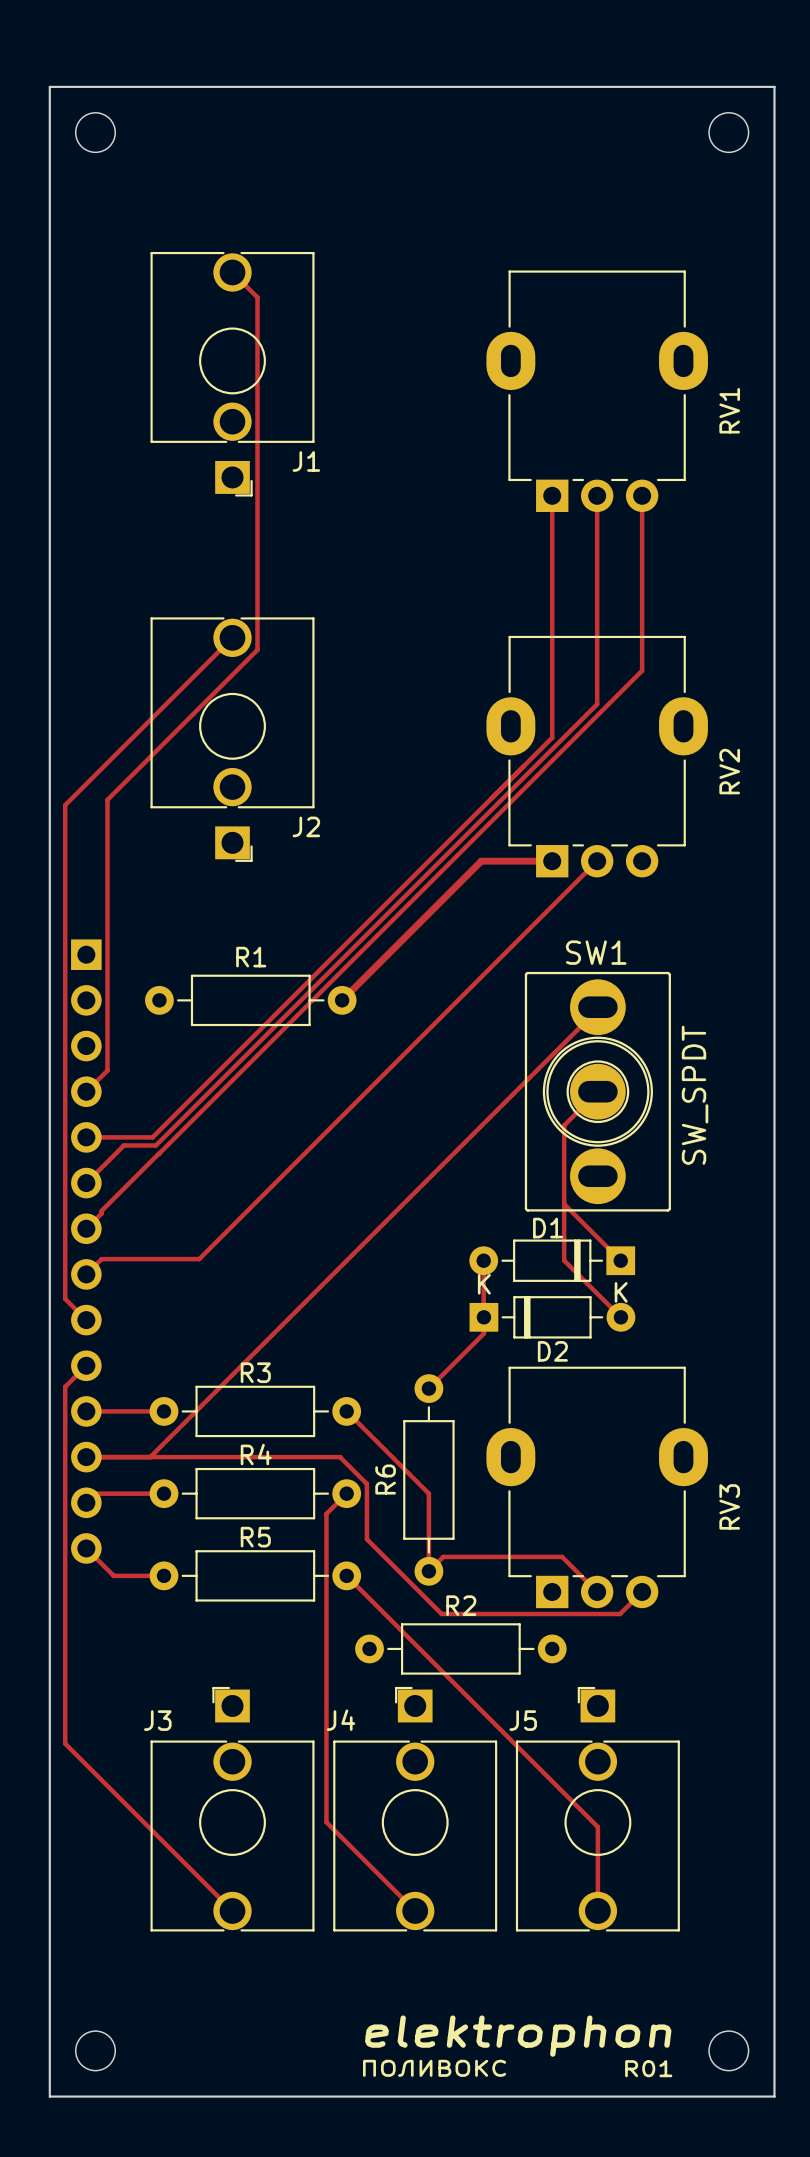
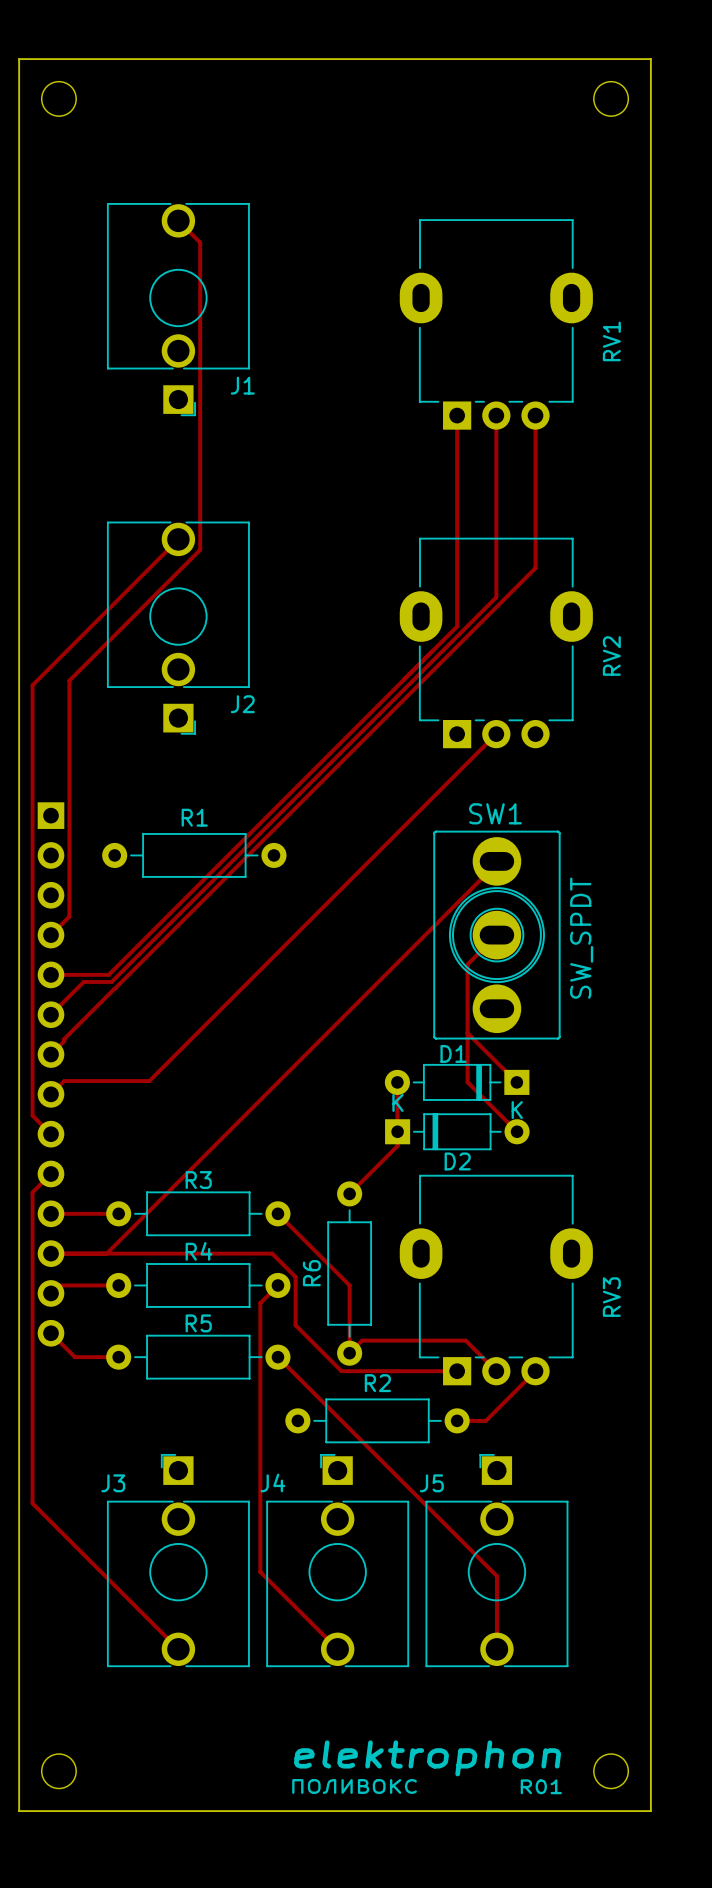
track: (552, 861) (481, 861) (342, 1000) -> none
track: (419, 1591) (441, 1614) (620, 1614) -> (341, 1371) (457, 1371)
track: none -> (516, 1390) (485, 1420) (457, 1420)

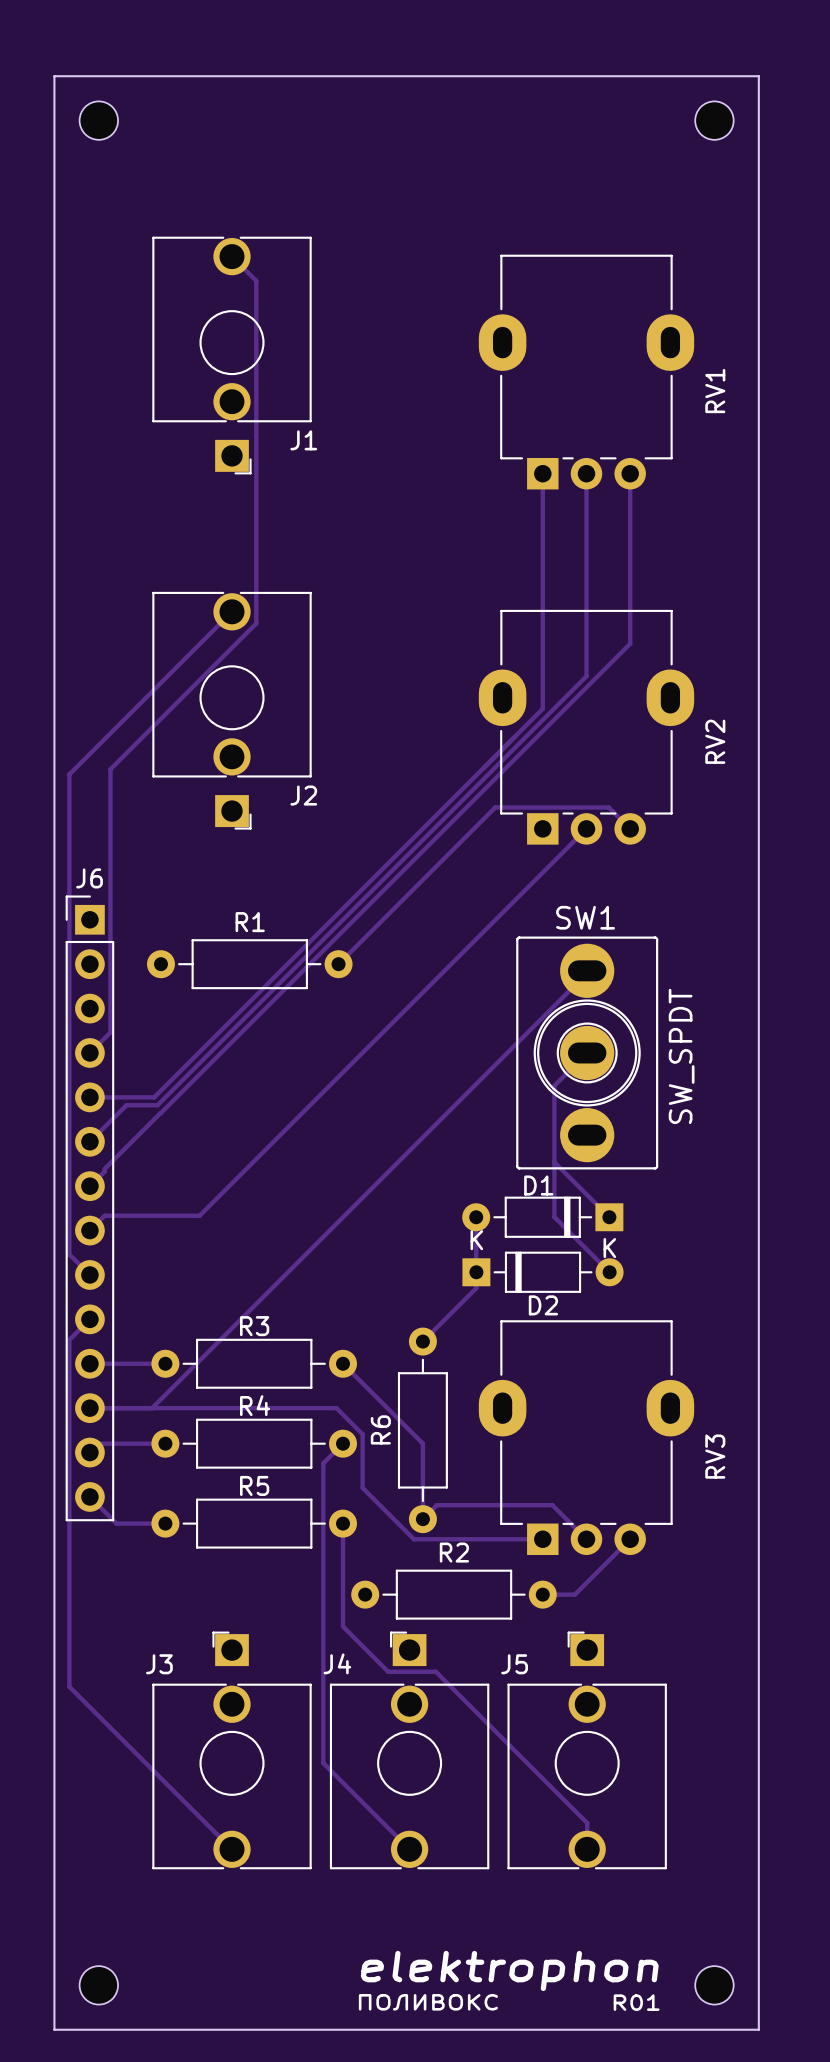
track: none -> (630, 828) (608, 807) (495, 807) (338, 964)
J6 side: bottom (50, 1074) -> top (89, 1208)
track: (277, 1357) (496, 1576) (496, 1625) -> (343, 1523) (343, 1626) (388, 1671) (435, 1671) (587, 1823)

